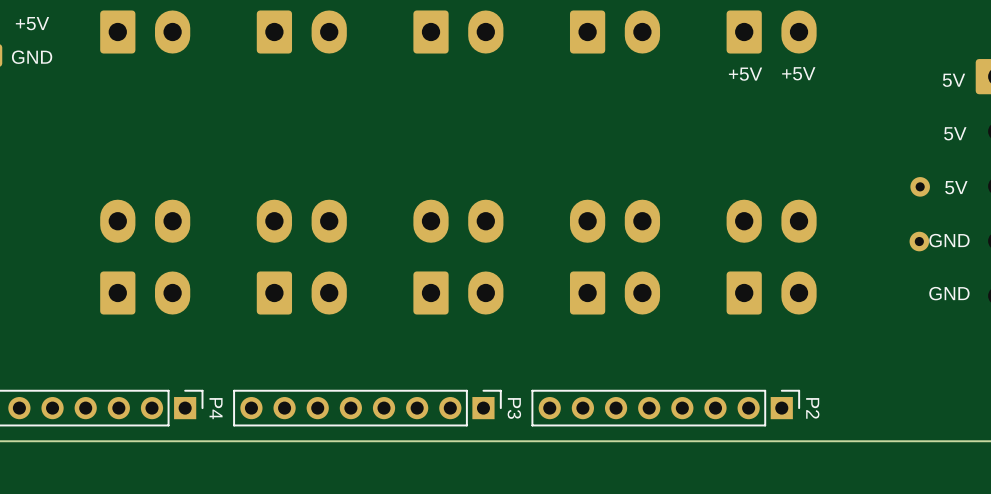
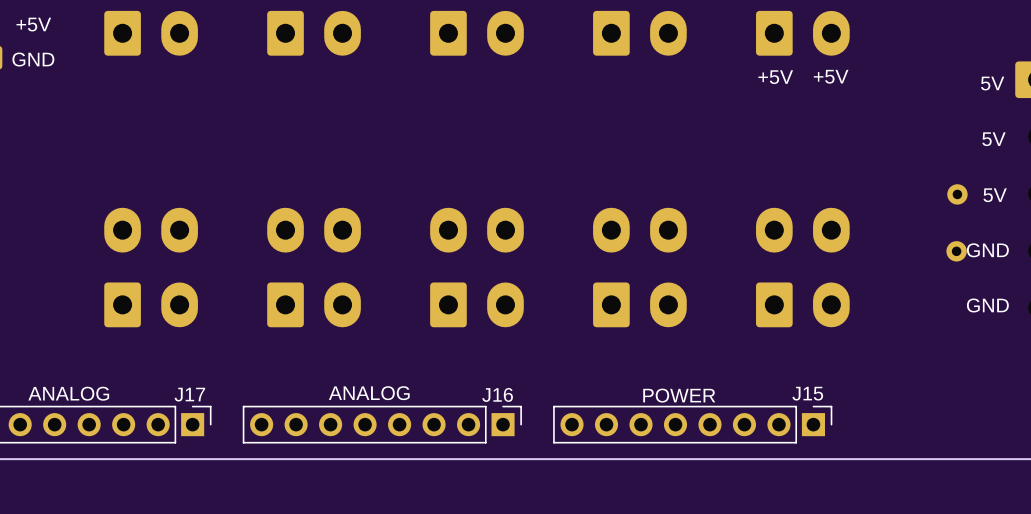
P3 text: none -> ANALOG (369, 393)
P4 text: none -> ANALOG (68, 393)
P2 text: none -> POWER (679, 395)
P4 name: P4 (216, 408) -> J17 (189, 394)
P3 name: P3 (514, 408) -> J16 (497, 394)
P2 name: P2 (812, 408) -> J15 (807, 393)

